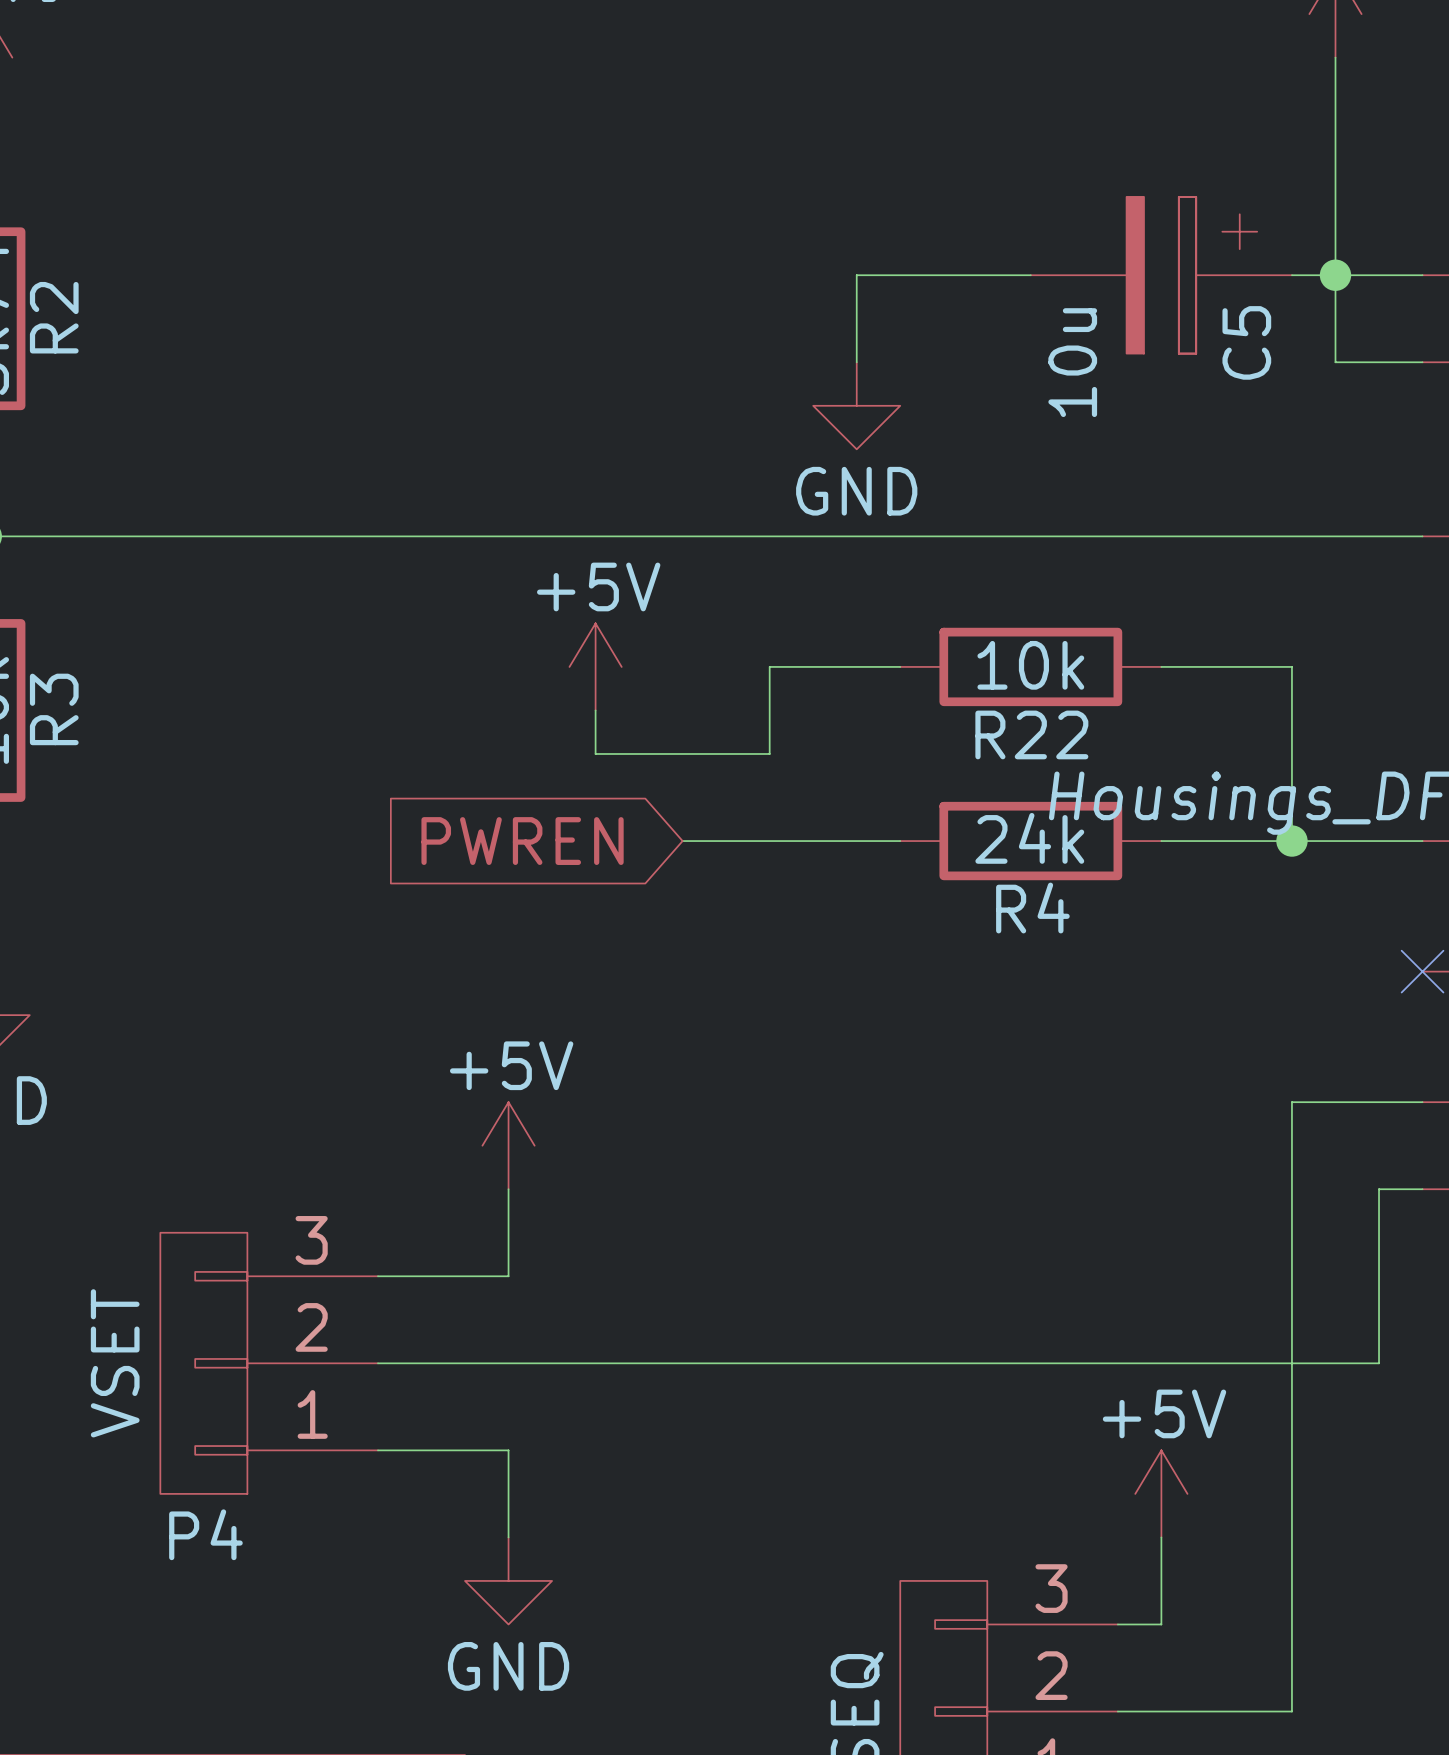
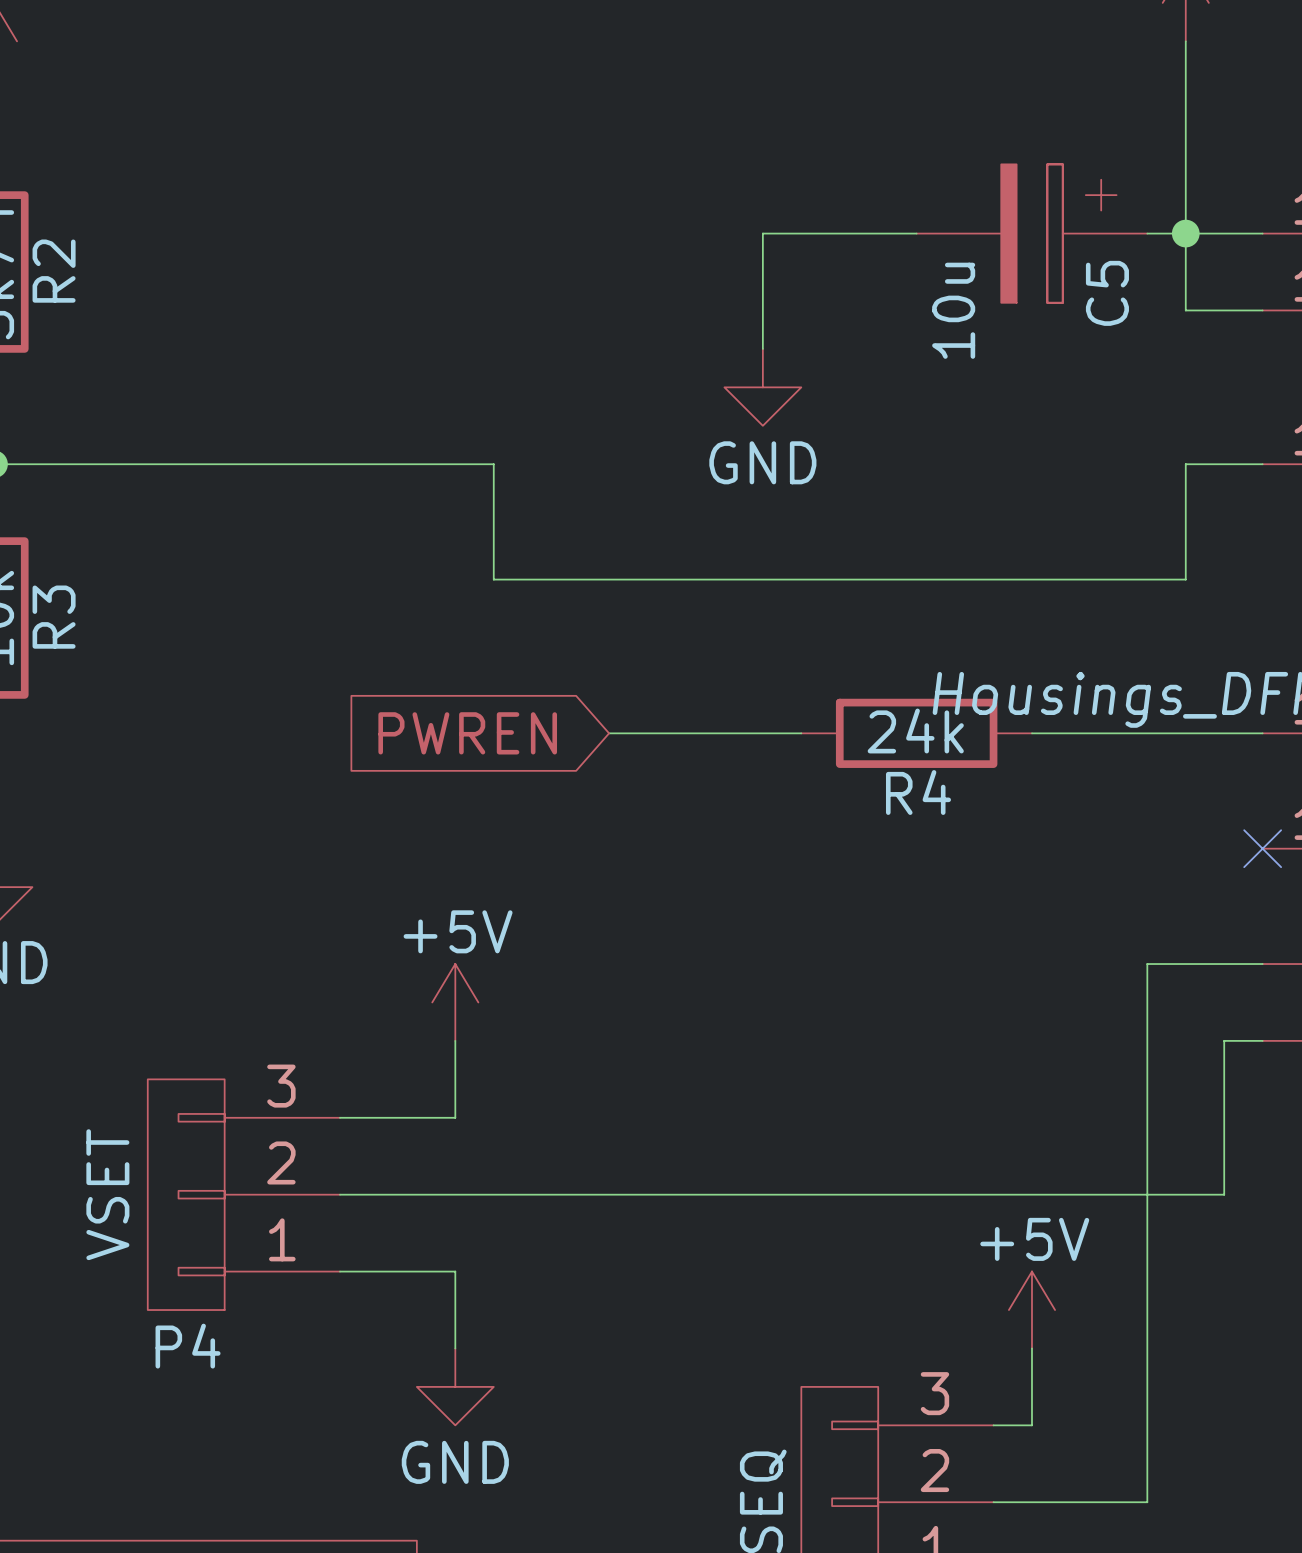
power symbol position: GND (856, 405) -> GND (762, 387)
wire: (552, 536) (1335, 536) -> none
power symbol: +5V (595, 666) -> none
wire: (769, 666) (769, 753) (595, 753) (595, 710) -> (685, 579) (493, 579) (493, 464)
wire: none -> (801, 579) (1031, 579)
R22: 10k (1030, 666) -> none
wire: (1291, 666) (1291, 841) -> (1147, 579) (1185, 579) (1185, 464)
junction: (1291, 841) -> none

